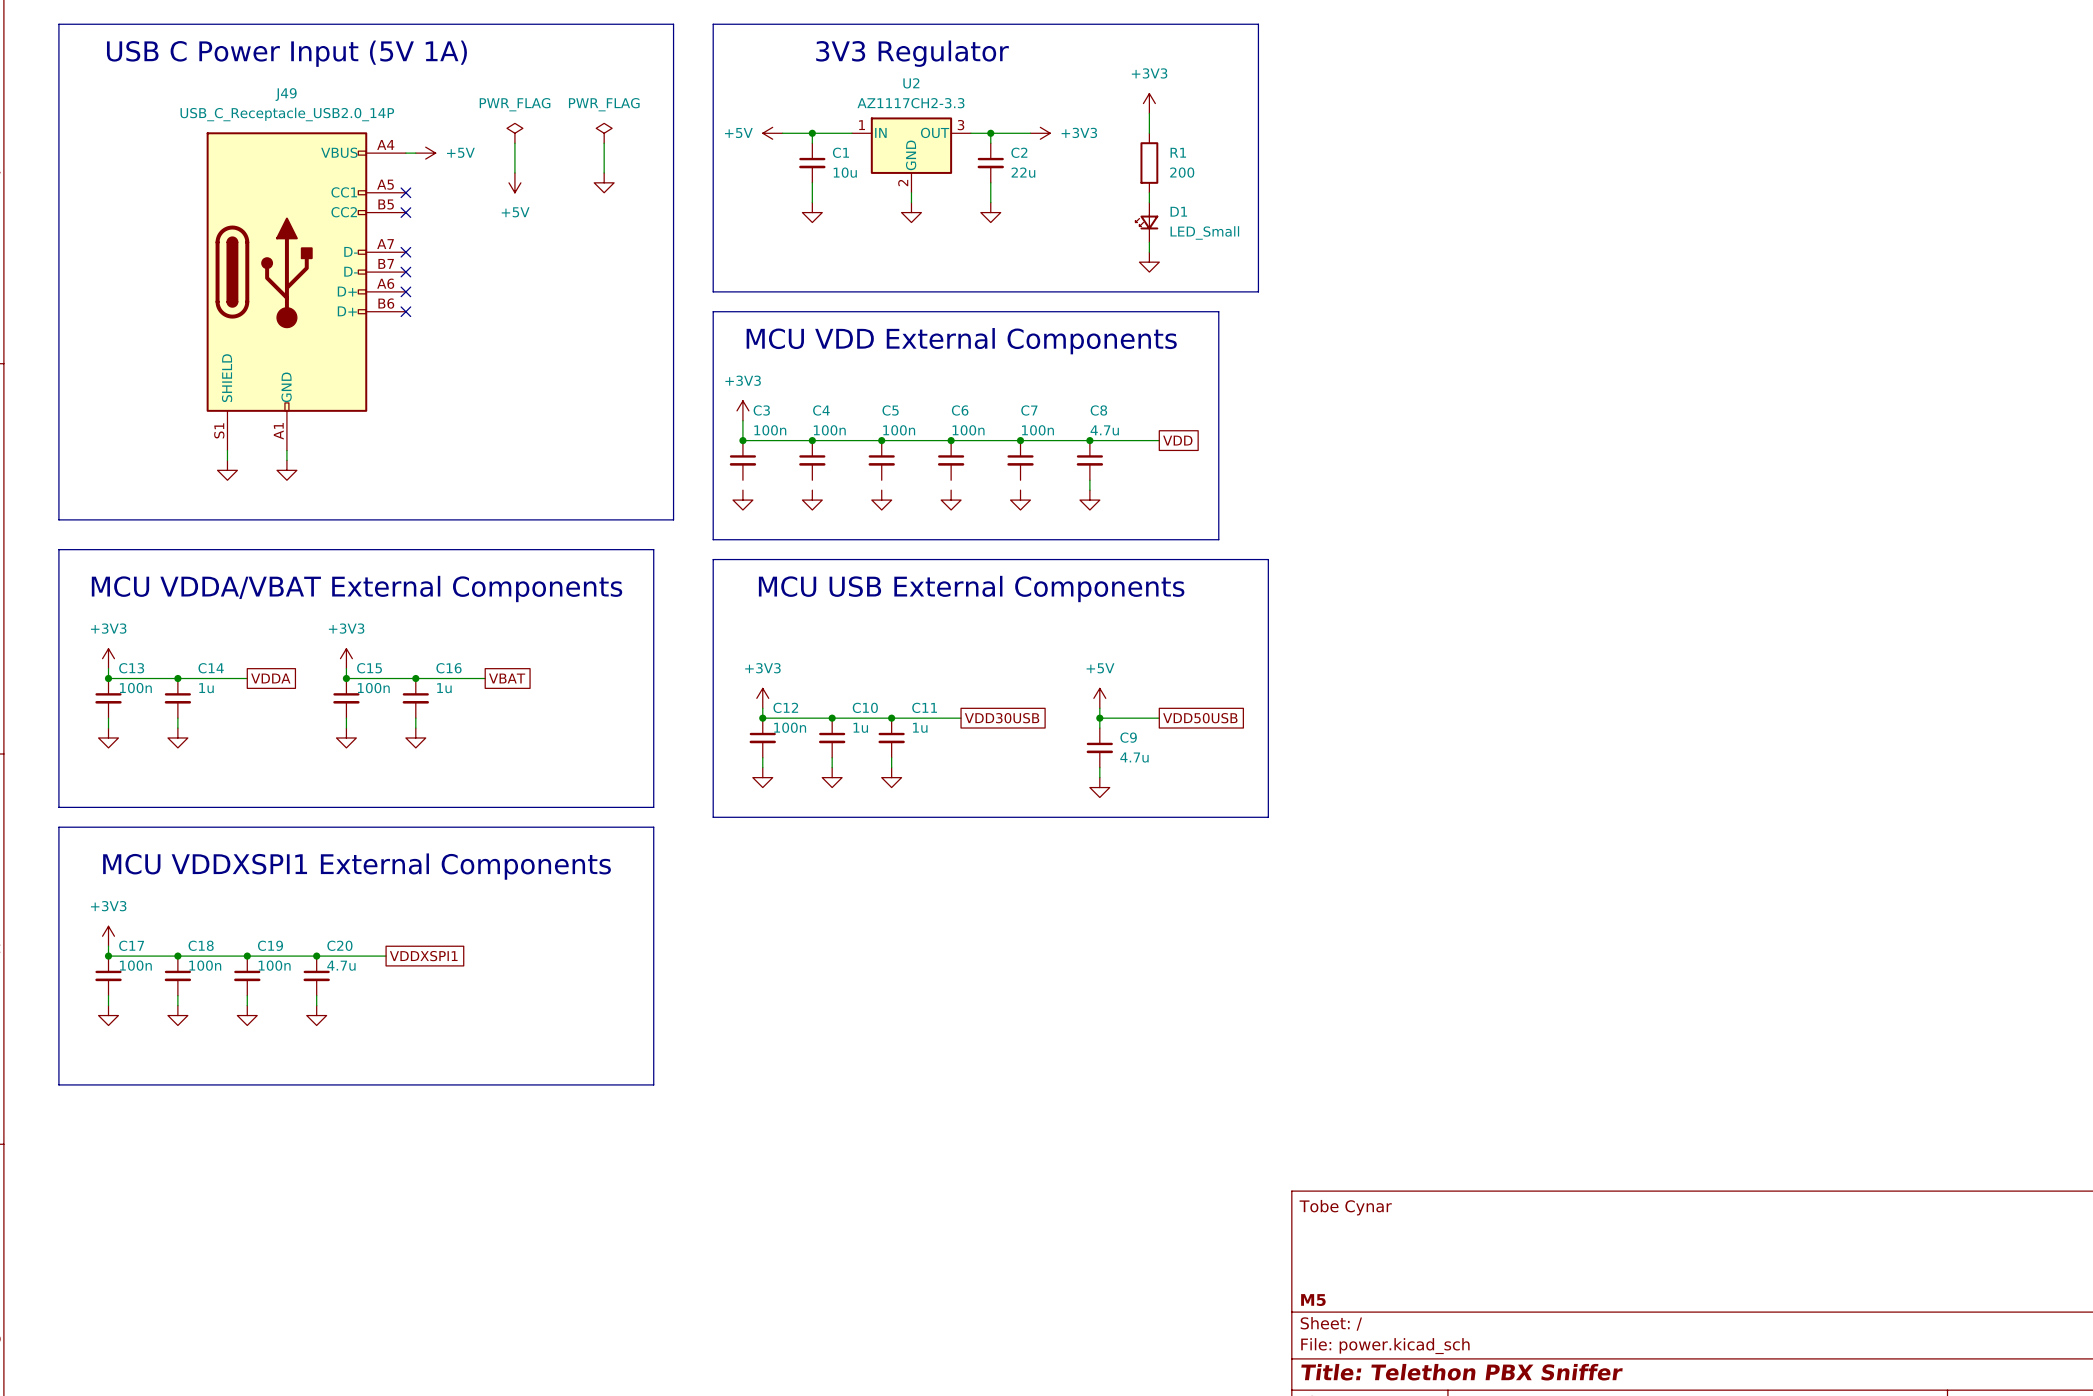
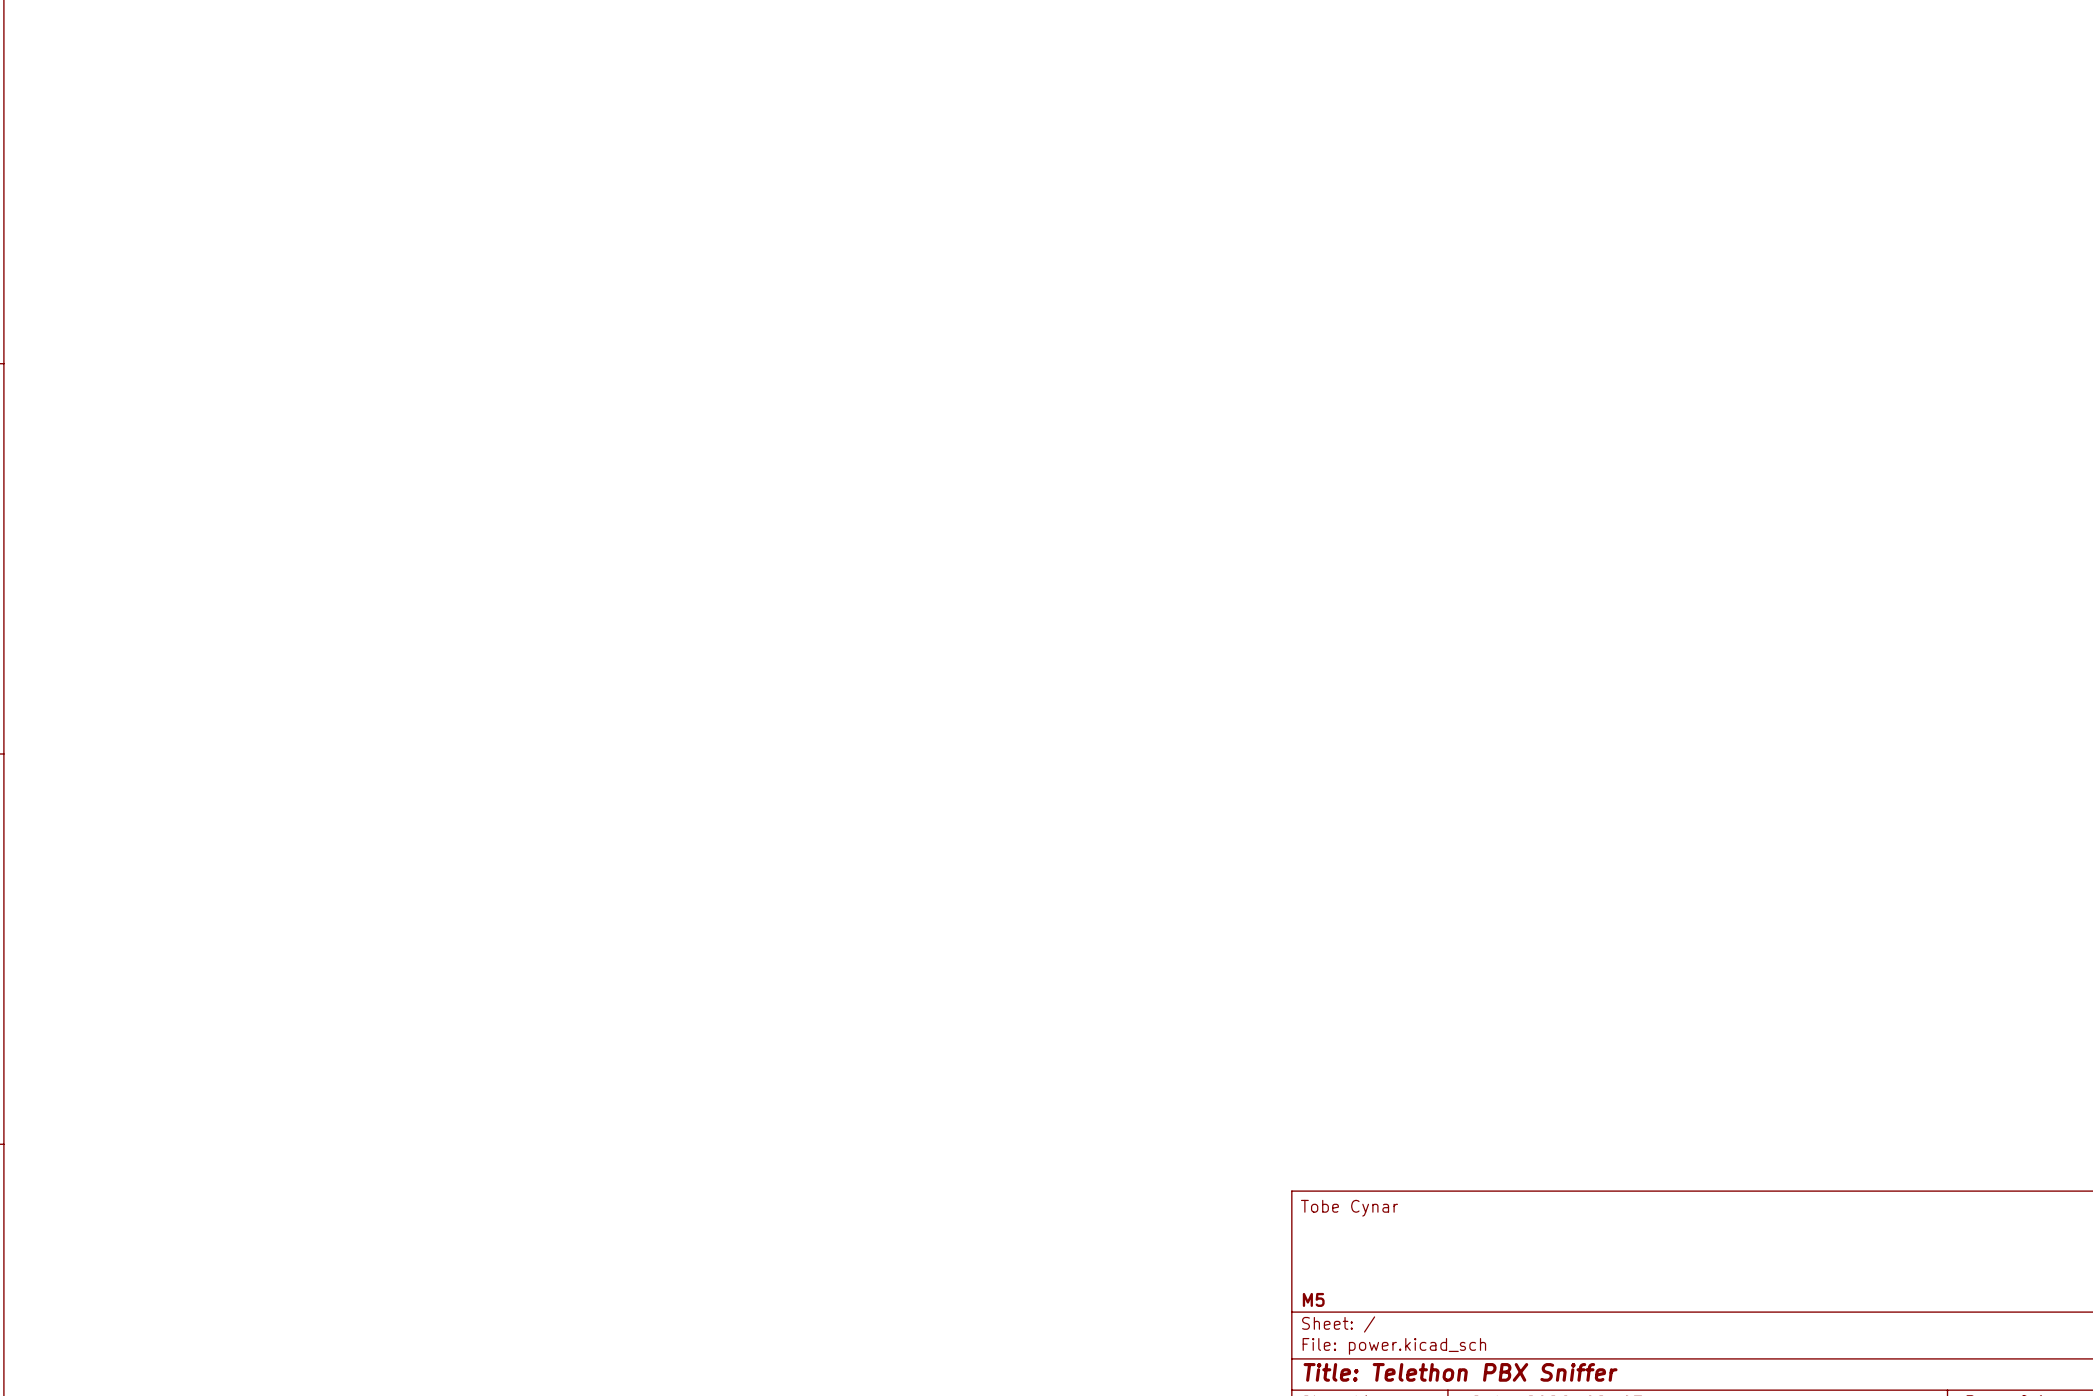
line: (58, 24) (58, 519) (673, 519) (673, 24) (58, 24) -> none
line: (713, 24) (713, 291) (1258, 291) (1258, 24) (713, 24) -> none
text: USB C Power Input (5V 1A) (286, 53) -> none
text: 3V3 Regulator (912, 53) -> none
power symbol: +3V3 (1149, 103) -> none
wire: (1149, 113) (1149, 133) -> none
power symbol: PWR_FLAG (514, 133) -> none
power symbol: PWR_FLAG (604, 133) -> none
power symbol: +5V (772, 133) -> none
wire: (782, 133) (851, 133) -> none
wire: (812, 133) (812, 143) -> none
junction: (812, 133) -> none
wire: (970, 133) (1030, 133) -> none
wire: (990, 133) (990, 143) -> none
junction: (990, 133) -> none
power symbol: +3V3 (1040, 133) -> none
wire: (514, 143) (514, 172) -> none
wire: (604, 143) (604, 172) -> none
wire: (405, 153) (415, 153) -> none
power symbol: +5V (425, 153) -> none
U2: AZ1117CH2-3.3 (911, 155) -> none
C1: 10u (812, 163) -> none
C2: 22u (990, 163) -> none
R1: 200 (1149, 163) -> none
power symbol: +5V (514, 182) -> none
power symbol: (604, 182) -> none
wire: (812, 182) (812, 202) -> none
wire: (990, 182) (990, 202) -> none
no-connect mark: (405, 192) -> none
wire: (911, 192) (911, 202) -> none
wire: (1149, 192) (1149, 202) -> none
no-connect mark: (405, 212) -> none
power symbol: (812, 212) -> none
power symbol: (911, 212) -> none
power symbol: (990, 212) -> none
D1: LED_Small (1146, 222) -> none
wire: (1149, 242) (1149, 252) -> none
no-connect mark: (405, 252) -> none
power symbol: (1149, 262) -> none
no-connect mark: (405, 272) -> none
J49: USB_C_Receptacle_USB2.0_14P (306, 291) -> none
no-connect mark: (405, 291) -> none
no-connect mark: (405, 311) -> none
line: (713, 311) (1218, 311) (1218, 539) (713, 539) (713, 311) -> none
text: MCU VDD External Components (961, 341) -> none
power symbol: +3V3 (742, 410) -> none
wire: (742, 420) (742, 440) (1159, 440) -> none
junction: (742, 440) -> none
junction: (812, 440) -> none
junction: (881, 440) -> none
junction: (951, 440) -> none
junction: (1020, 440) -> none
junction: (1089, 440) -> none
global label: VDD (1177, 440) -> none
wire: (227, 450) (227, 460) -> none
wire: (286, 450) (286, 460) -> none
C3: 100n (742, 460) -> none
C4: 100n (812, 460) -> none
C5: 100n (881, 460) -> none
C6: 100n (951, 460) -> none
C7: 100n (1020, 460) -> none
C8: 4.7u (1089, 460) -> none
power symbol: (227, 470) -> none
power symbol: (286, 470) -> none
wire: (1089, 480) (1089, 490) -> none
power symbol: (742, 500) -> none
power symbol: (812, 500) -> none
power symbol: (881, 500) -> none
power symbol: (951, 500) -> none
power symbol: (1020, 500) -> none
power symbol: (1089, 500) -> none
line: (58, 549) (58, 807) (653, 807) (653, 549) (58, 549) -> none
line: (713, 559) (713, 817) (1268, 817) (1268, 559) (713, 559) -> none
text: MCU VDDA/VBAT External Components (357, 589) -> none
text: MCU USB External Components (971, 589) -> none
power symbol: +3V3 (108, 658) -> none
power symbol: +3V3 (346, 658) -> none
wire: (108, 668) (108, 678) (247, 678) -> none
wire: (346, 668) (346, 678) (485, 678) -> none
junction: (108, 678) -> none
junction: (177, 678) -> none
global label: VDDA (270, 678) -> none
junction: (346, 678) -> none
junction: (415, 678) -> none
global label: VBAT (507, 678) -> none
C13: 100n (108, 698) -> none
C14: 1u (177, 698) -> none
C15: 100n (346, 698) -> none
C16: 1u (415, 698) -> none
power symbol: +3V3 (762, 698) -> none
power symbol: +5V (1099, 698) -> none
wire: (762, 708) (762, 718) (961, 718) -> none
wire: (1099, 708) (1099, 728) -> none
wire: (108, 718) (108, 728) -> none
wire: (177, 718) (177, 728) -> none
wire: (346, 718) (346, 728) -> none
wire: (415, 718) (415, 728) -> none
junction: (762, 718) -> none
junction: (832, 718) -> none
junction: (891, 718) -> none
global label: VDD30USB (1002, 718) -> none
wire: (1099, 718) (1159, 718) -> none
junction: (1099, 718) -> none
global label: VDD50USB (1200, 718) -> none
power symbol: (108, 737) -> none
power symbol: (177, 737) -> none
power symbol: (346, 737) -> none
power symbol: (415, 737) -> none
C12: 100n (762, 737) -> none
C10: 1u (832, 737) -> none
C11: 1u (891, 737) -> none
C9: 4.7u (1099, 747) -> none
wire: (762, 757) (762, 767) -> none
wire: (832, 757) (832, 767) -> none
wire: (891, 757) (891, 767) -> none
wire: (1099, 767) (1099, 777) -> none
power symbol: (762, 777) -> none
power symbol: (832, 777) -> none
power symbol: (891, 777) -> none
power symbol: (1099, 787) -> none
line: (58, 827) (653, 827) (653, 1084) (58, 1084) (58, 827) -> none
text: MCU VDDXSPI1 External Components (357, 866) -> none
power symbol: +3V3 (108, 936) -> none
wire: (108, 946) (108, 956) (386, 956) -> none
junction: (108, 956) -> none
junction: (177, 956) -> none
junction: (247, 956) -> none
junction: (316, 956) -> none
global label: VDDXSPI1 (423, 956) -> none
C17: 100n (108, 975) -> none
C18: 100n (177, 975) -> none
C19: 100n (247, 975) -> none
C20: 4.7u (316, 975) -> none
wire: (108, 995) (108, 1005) -> none
wire: (177, 995) (177, 1005) -> none
wire: (247, 995) (247, 1005) -> none
wire: (316, 995) (316, 1005) -> none
power symbol: (108, 1015) -> none
power symbol: (177, 1015) -> none
power symbol: (247, 1015) -> none
power symbol: (316, 1015) -> none

